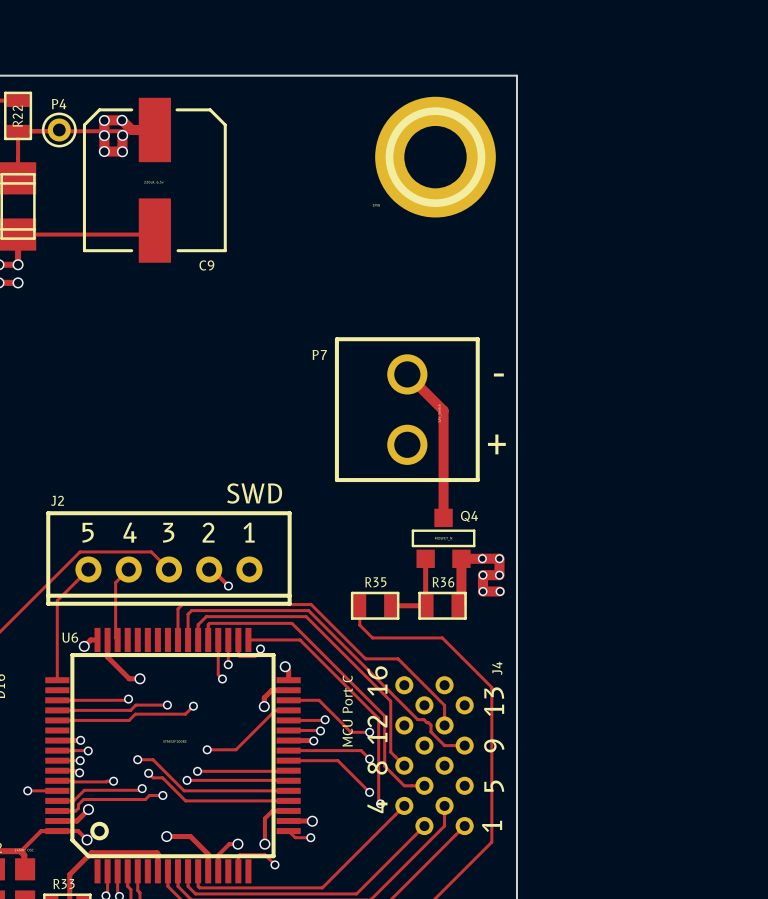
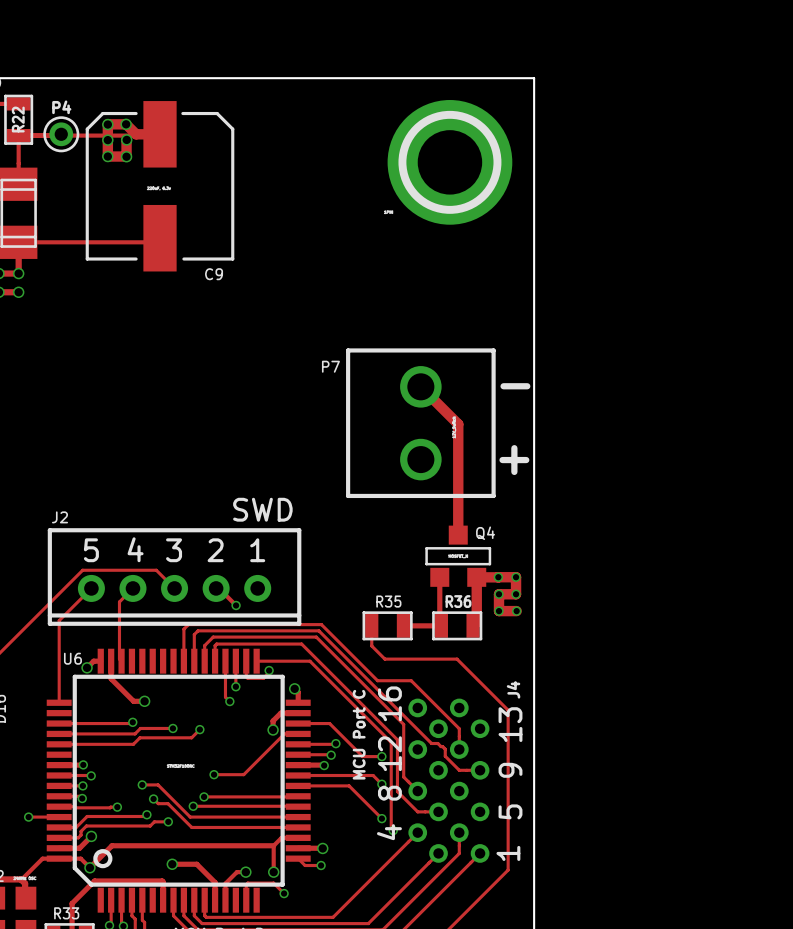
track: none -> (273, 845) (111, 845) (89, 867)

